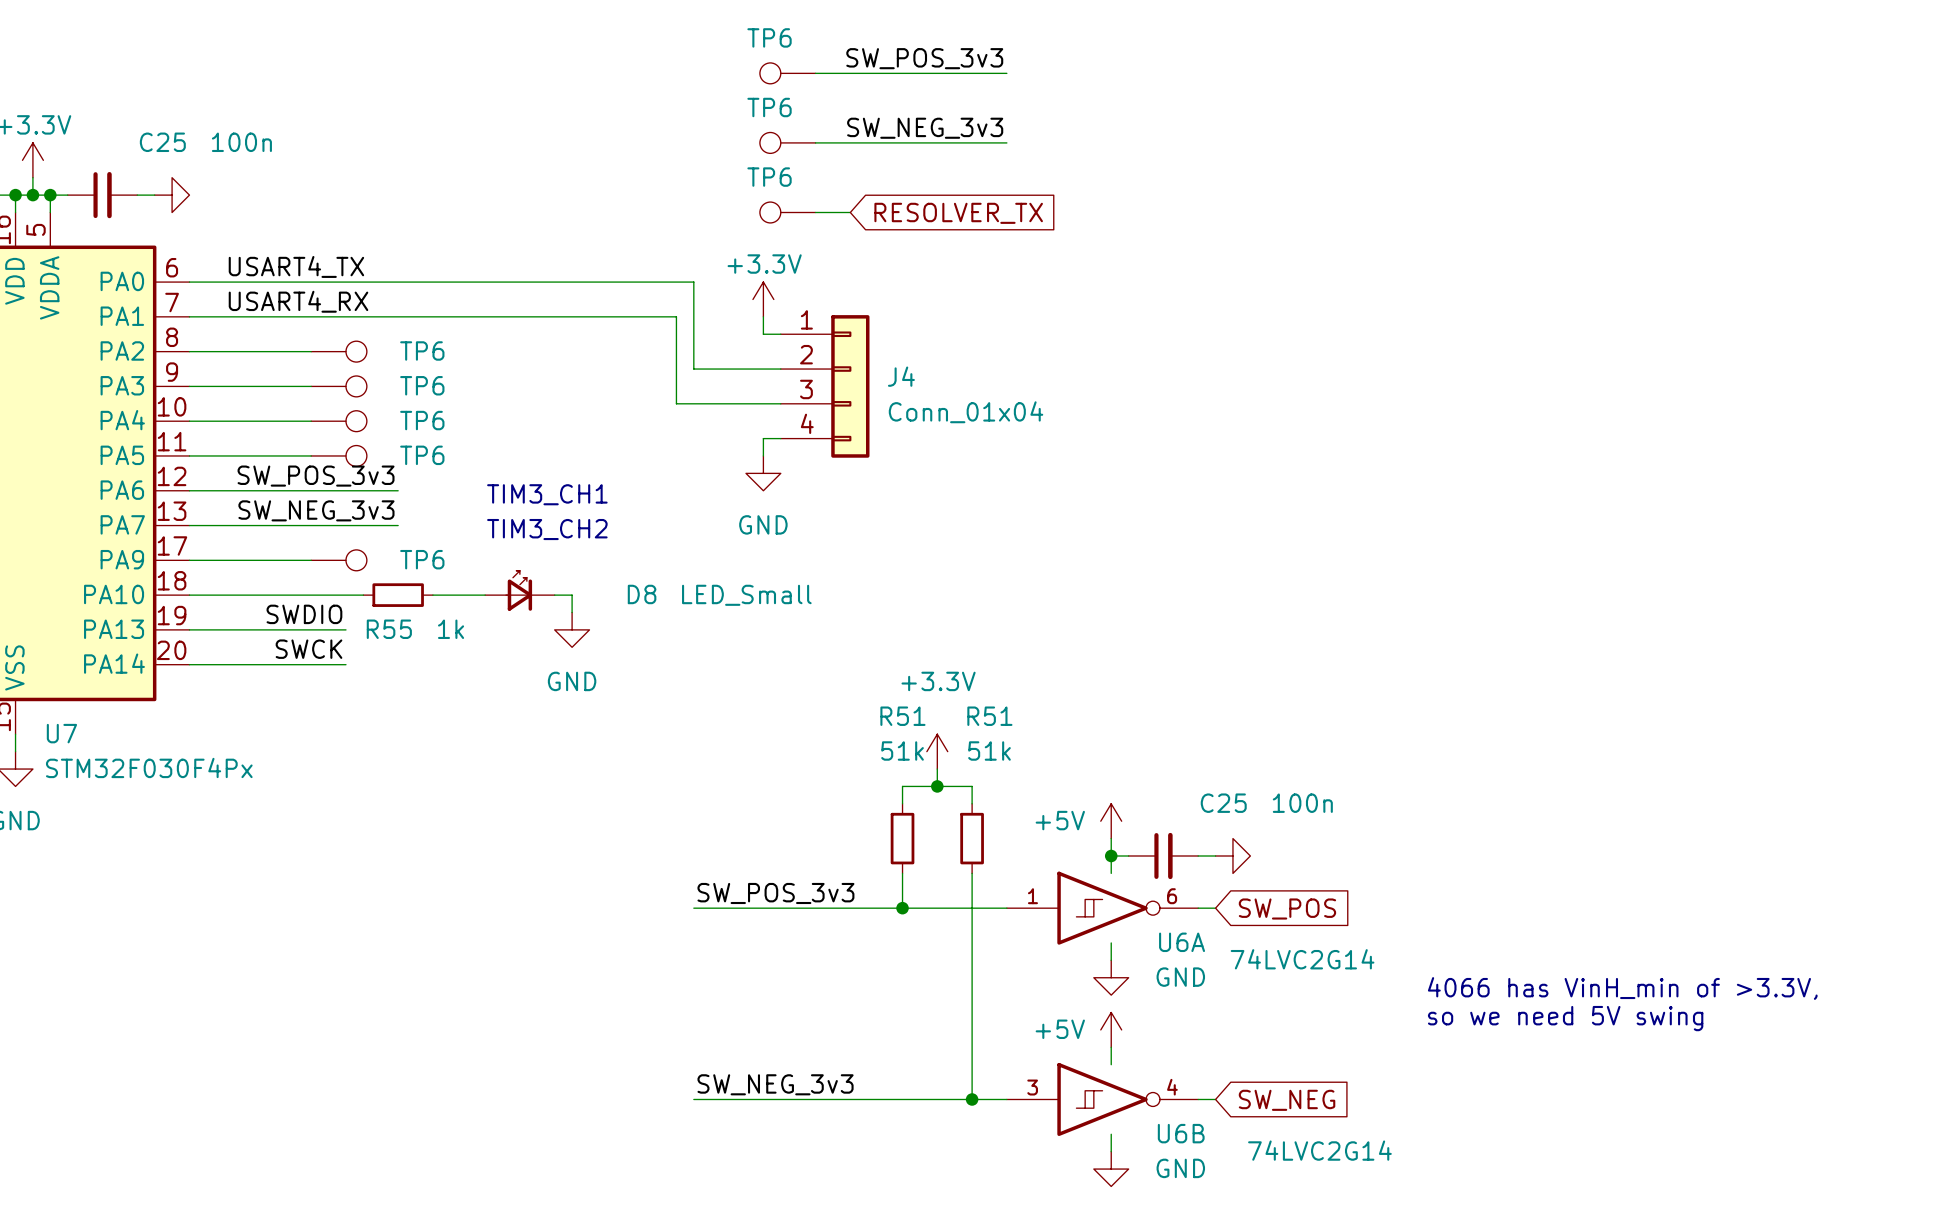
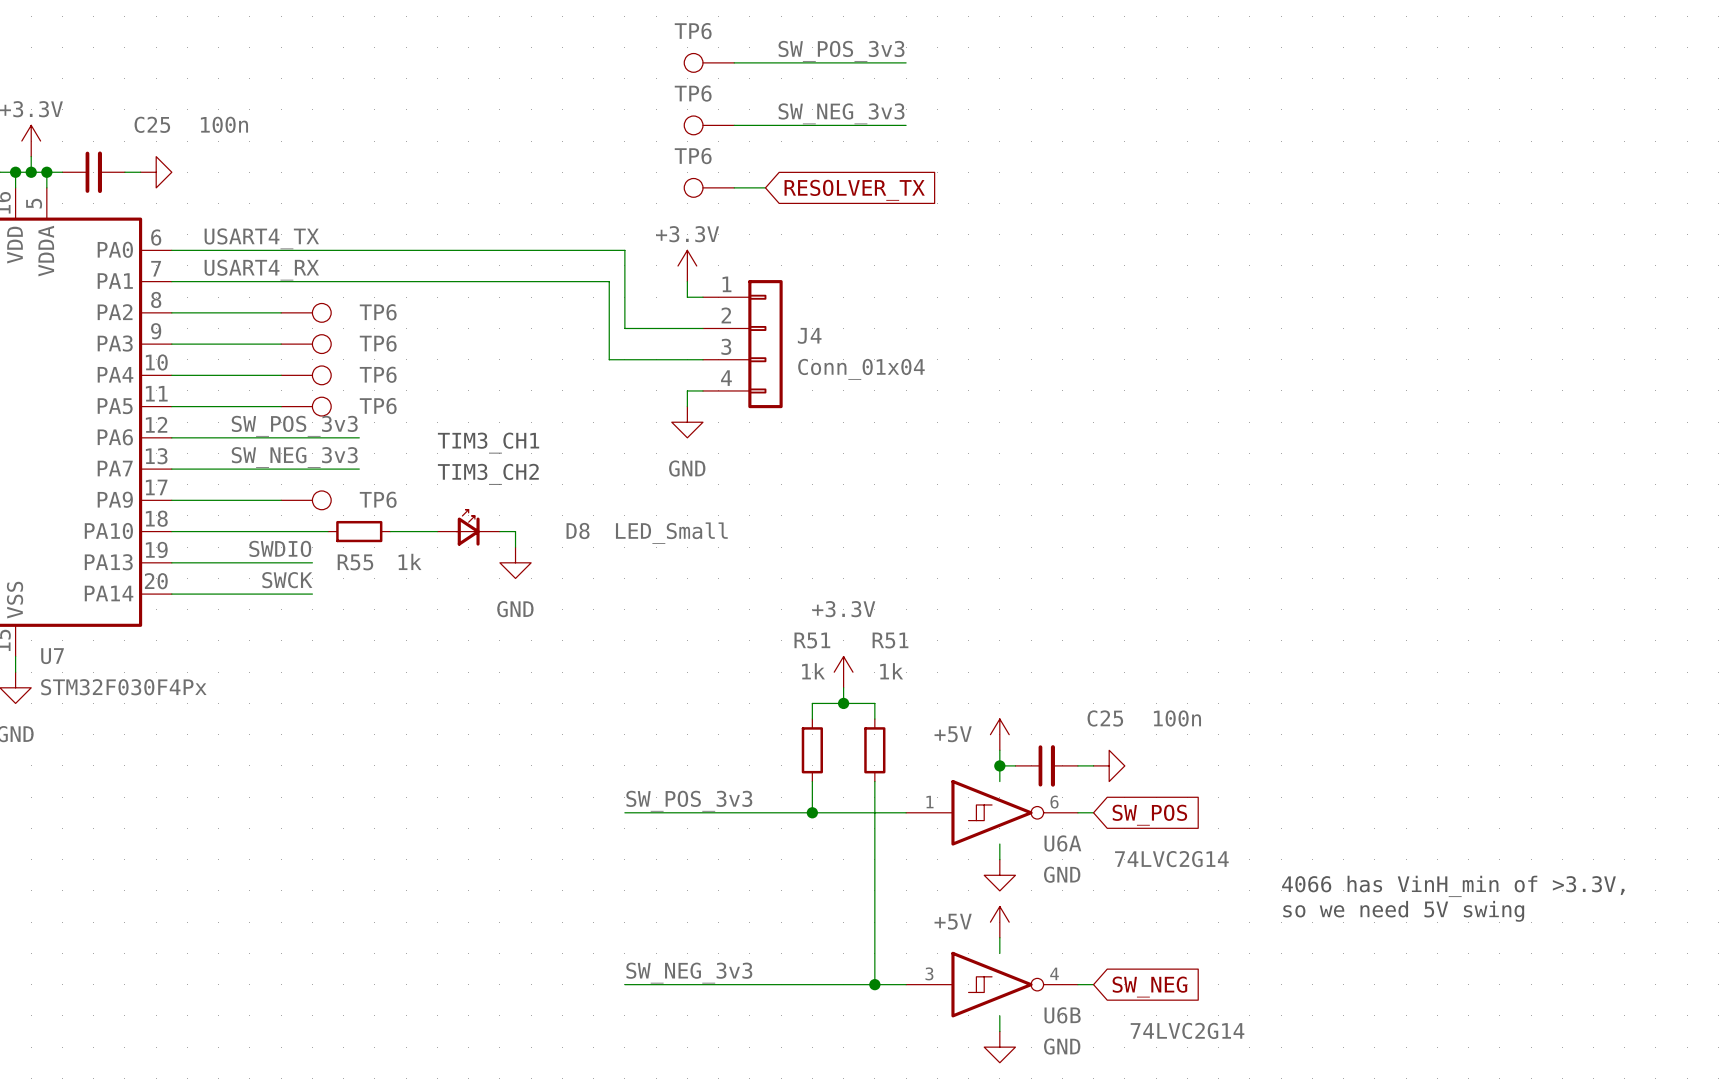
R51 value: 51k (902, 750) -> 1k (813, 671)
R51 value: 51k (989, 750) -> 1k (891, 671)

